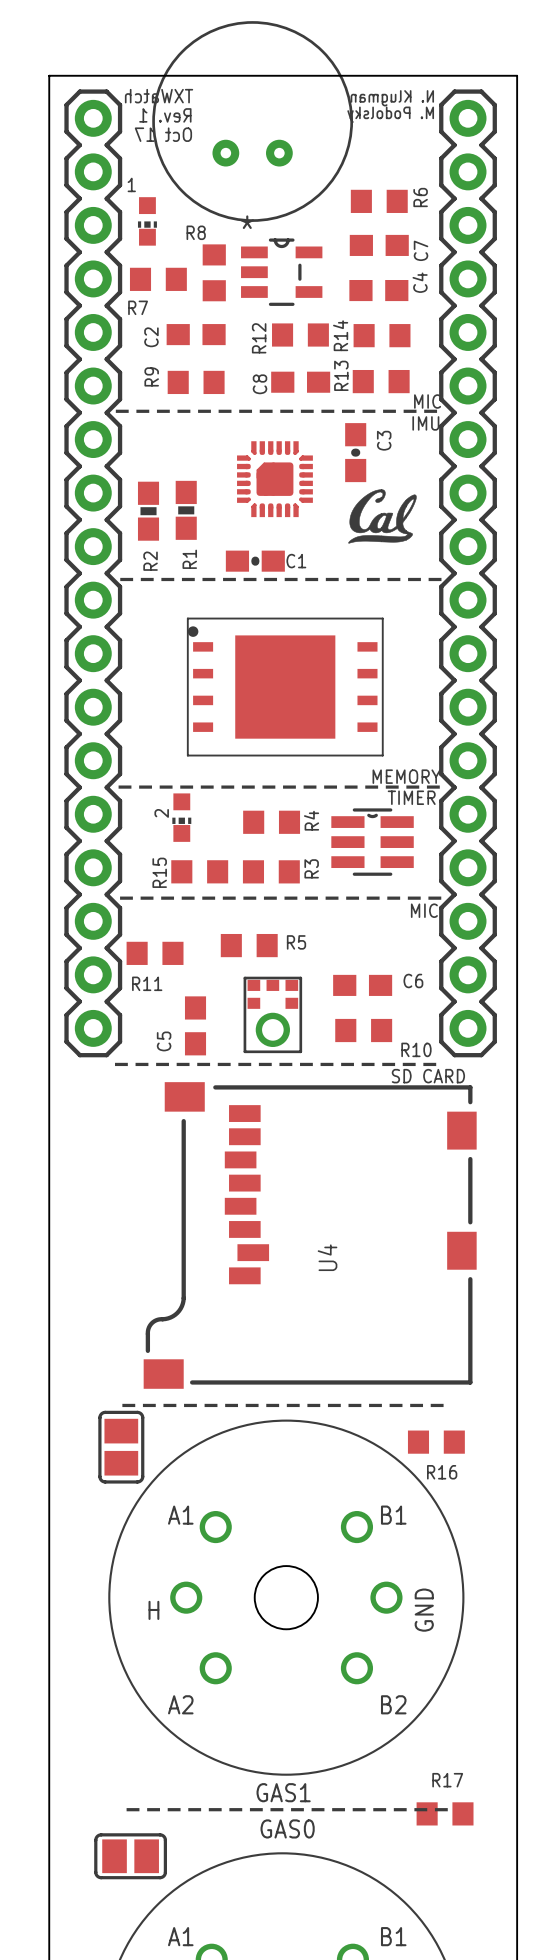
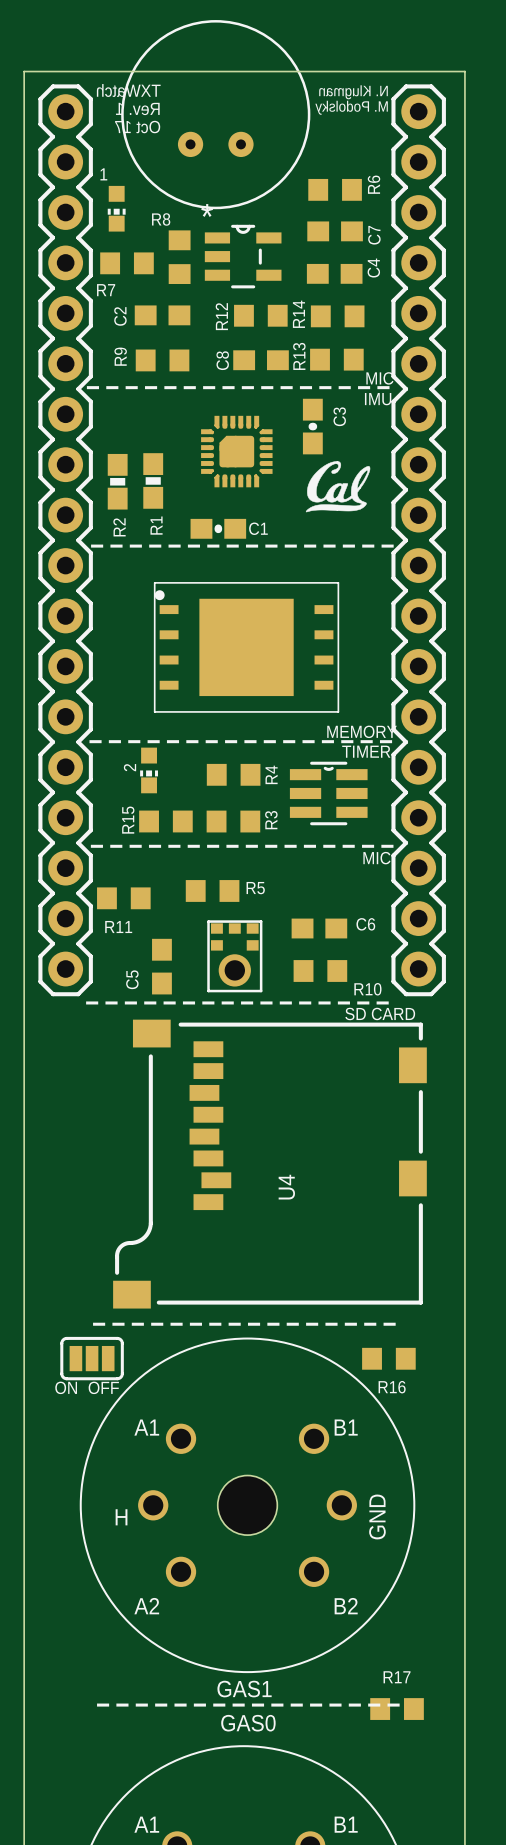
part footprint: [98, 1410, 145, 1484] -> [60, 1336, 124, 1381]
text: none -> ON (66, 1387)
text: none -> OFF (103, 1387)
part: (130, 1856) -> none

